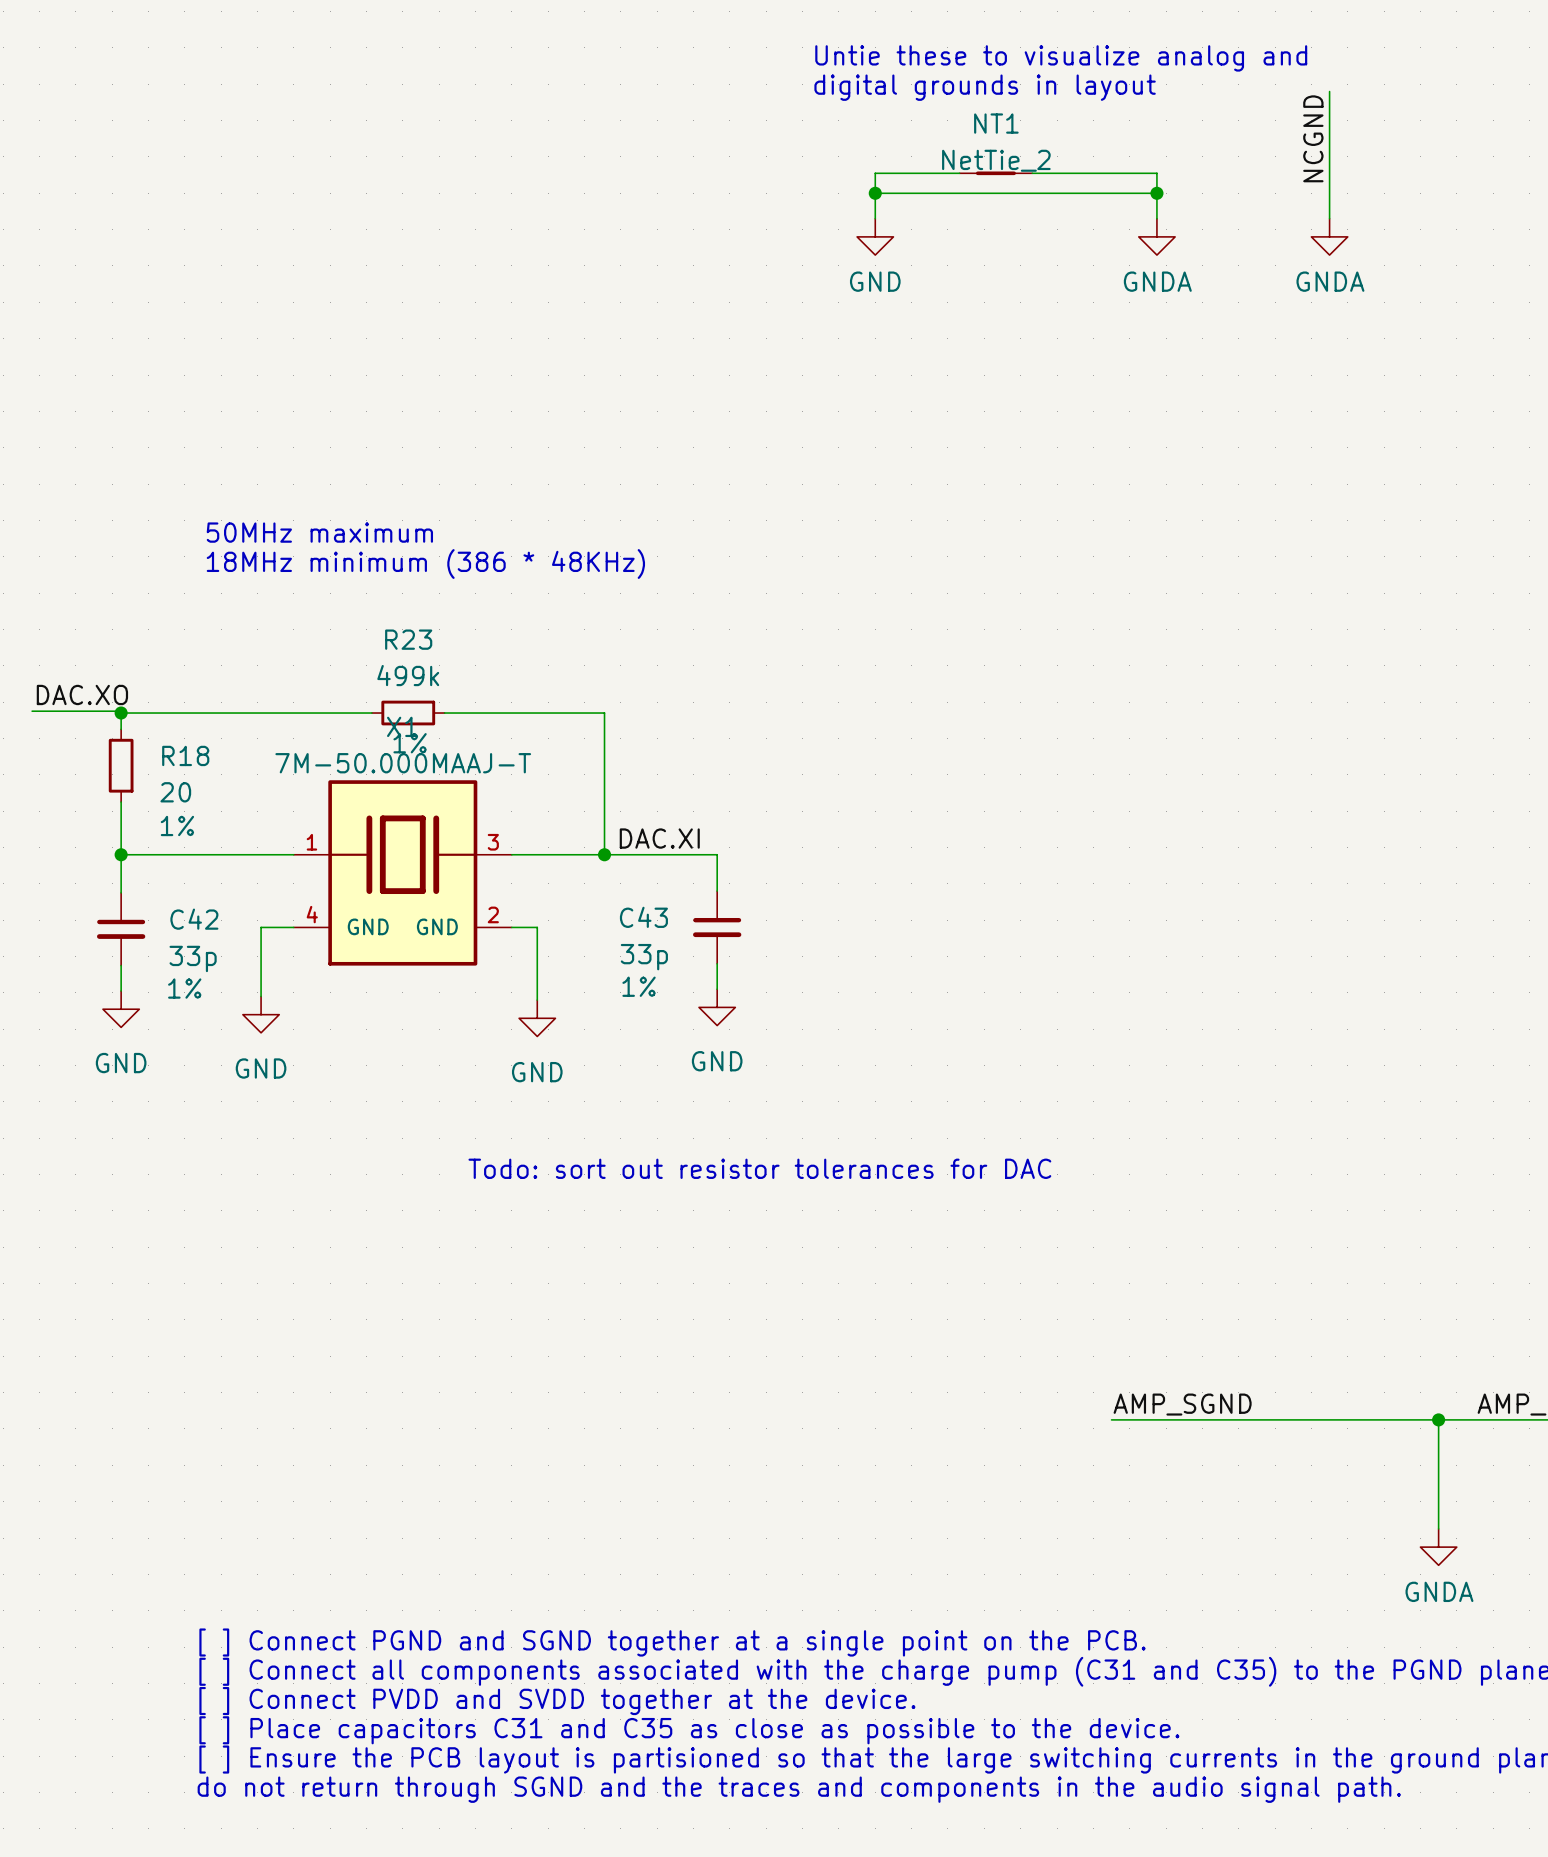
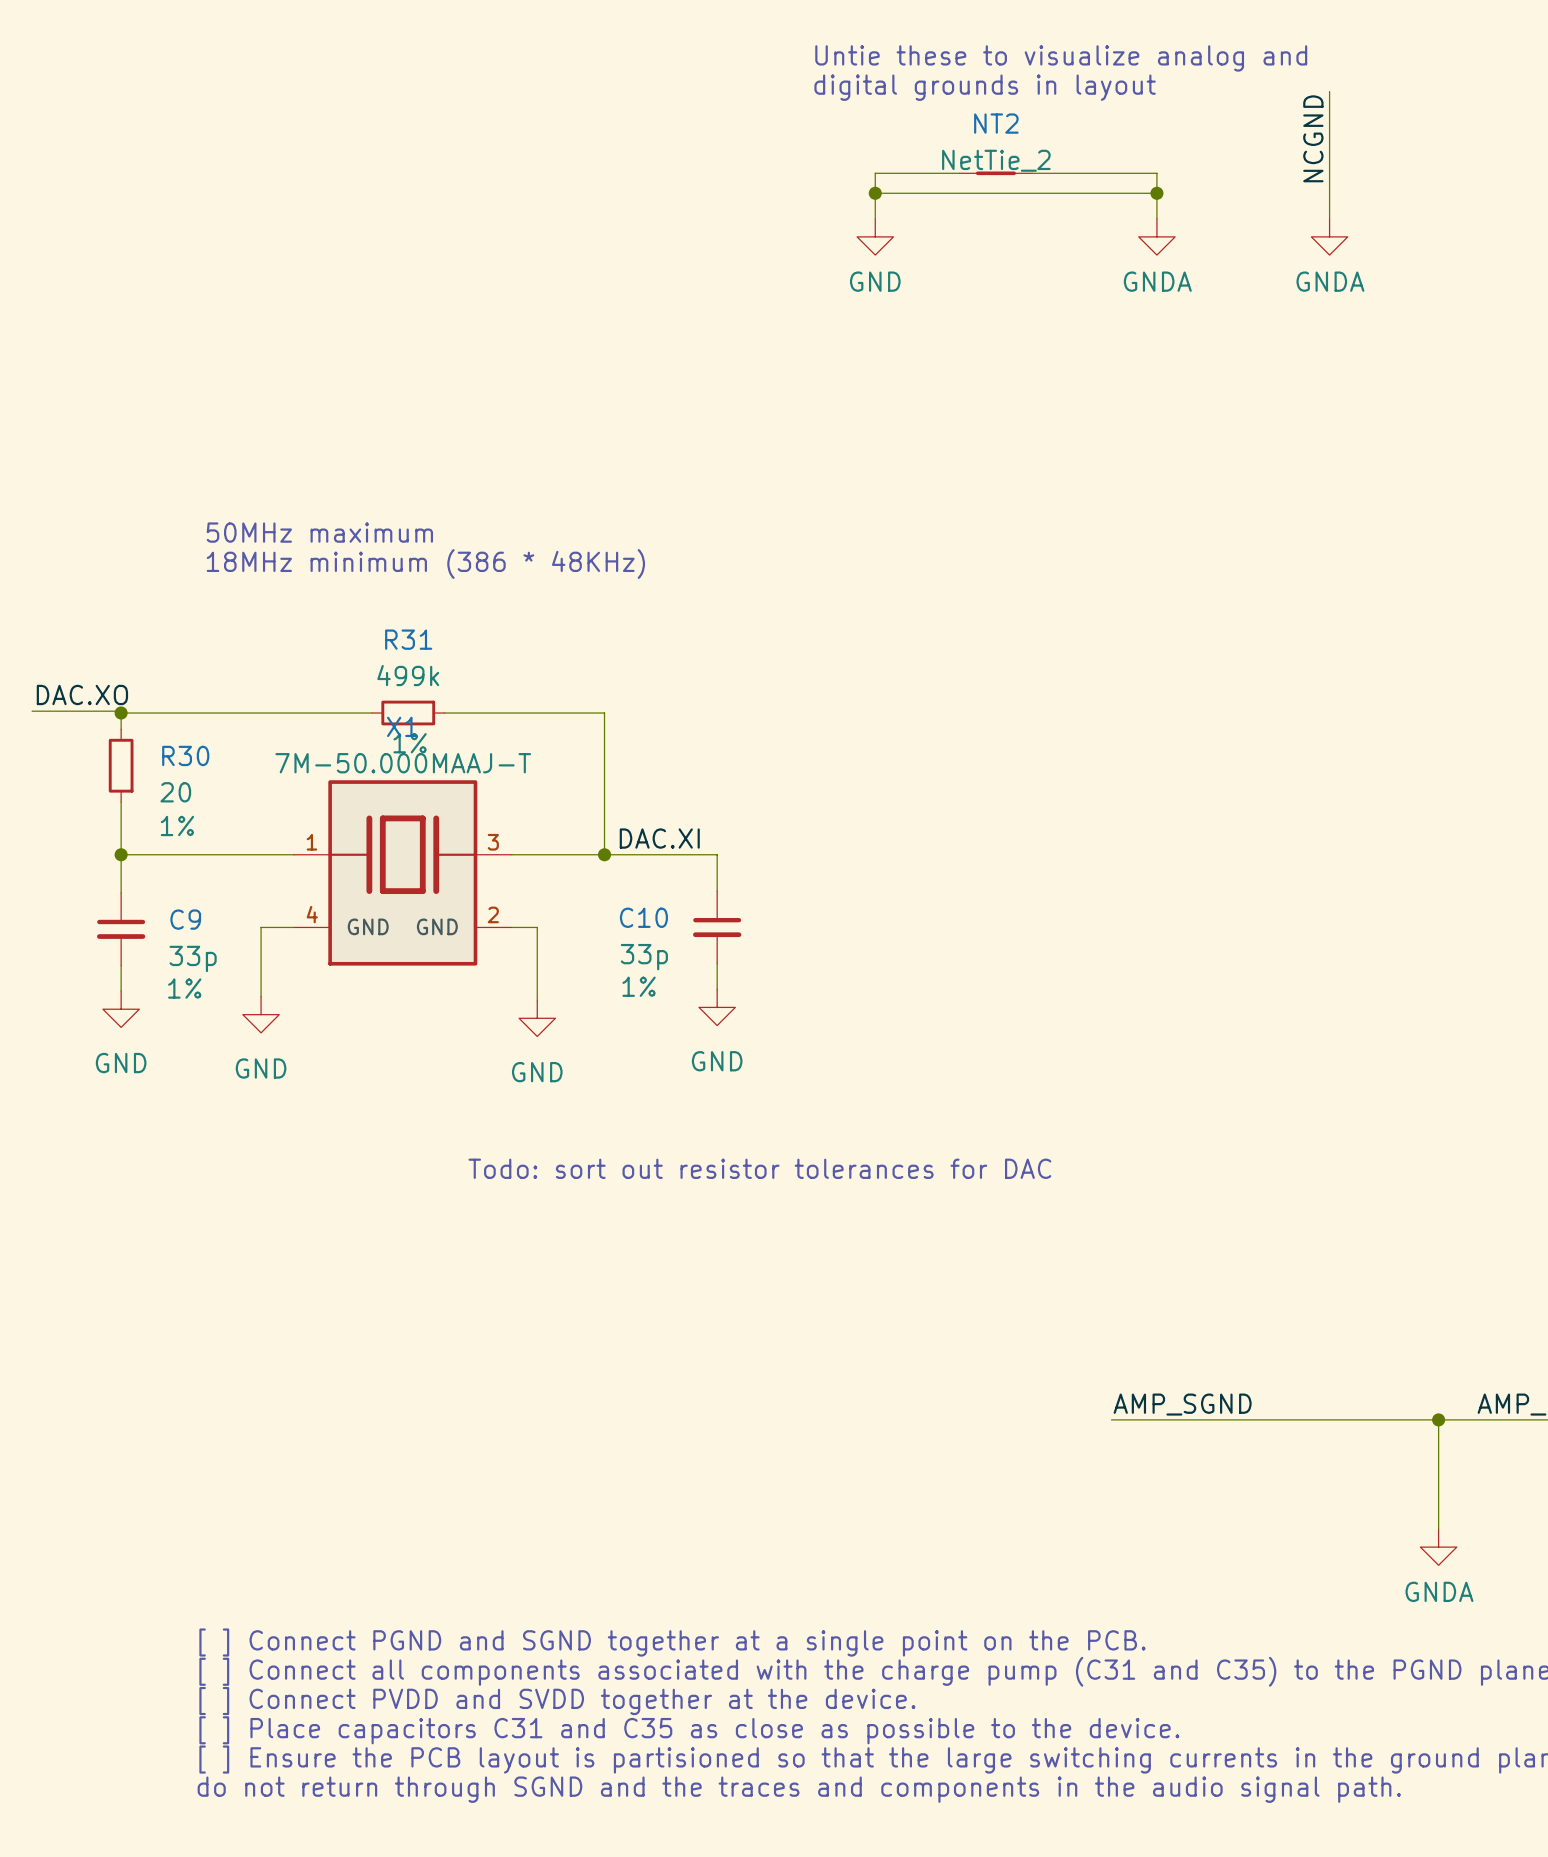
NT1 name: NT1 (996, 123) -> NT2 (996, 123)
R23 name: R23 (408, 639) -> R31 (408, 639)
R18 name: R18 (185, 755) -> R30 (185, 755)
C43 name: C43 (643, 917) -> C10 (643, 917)
C42 name: C42 (194, 919) -> C9 (185, 919)

